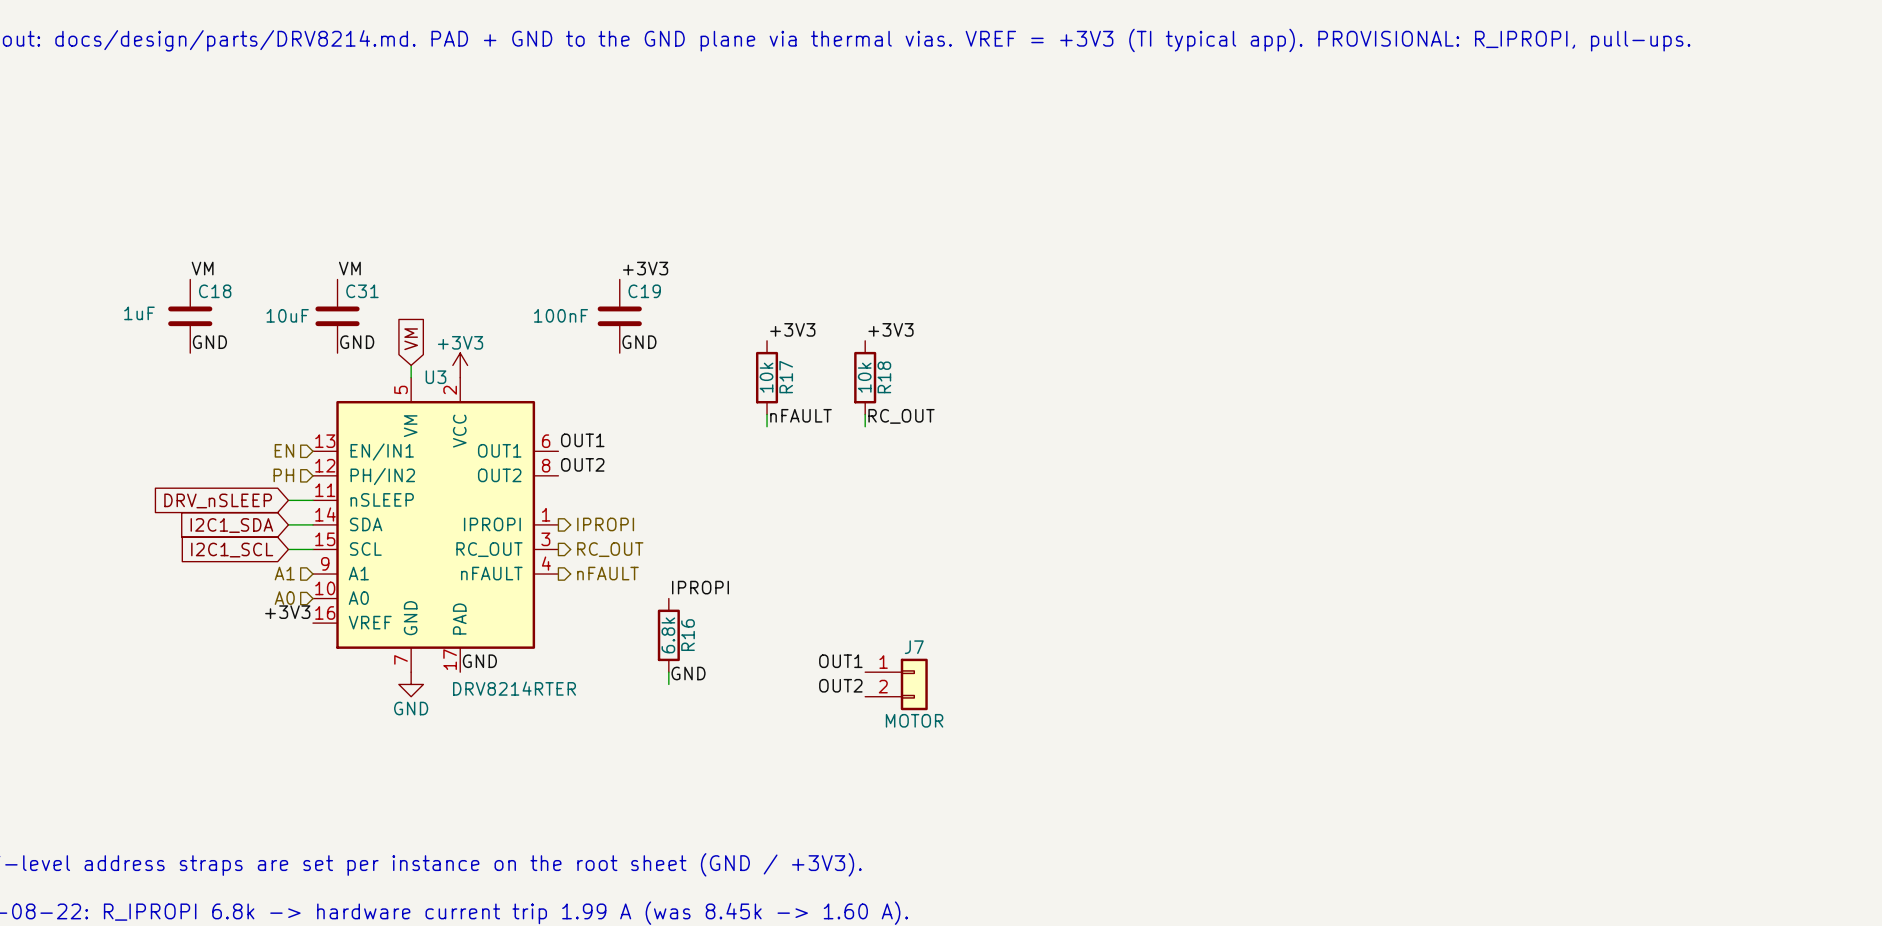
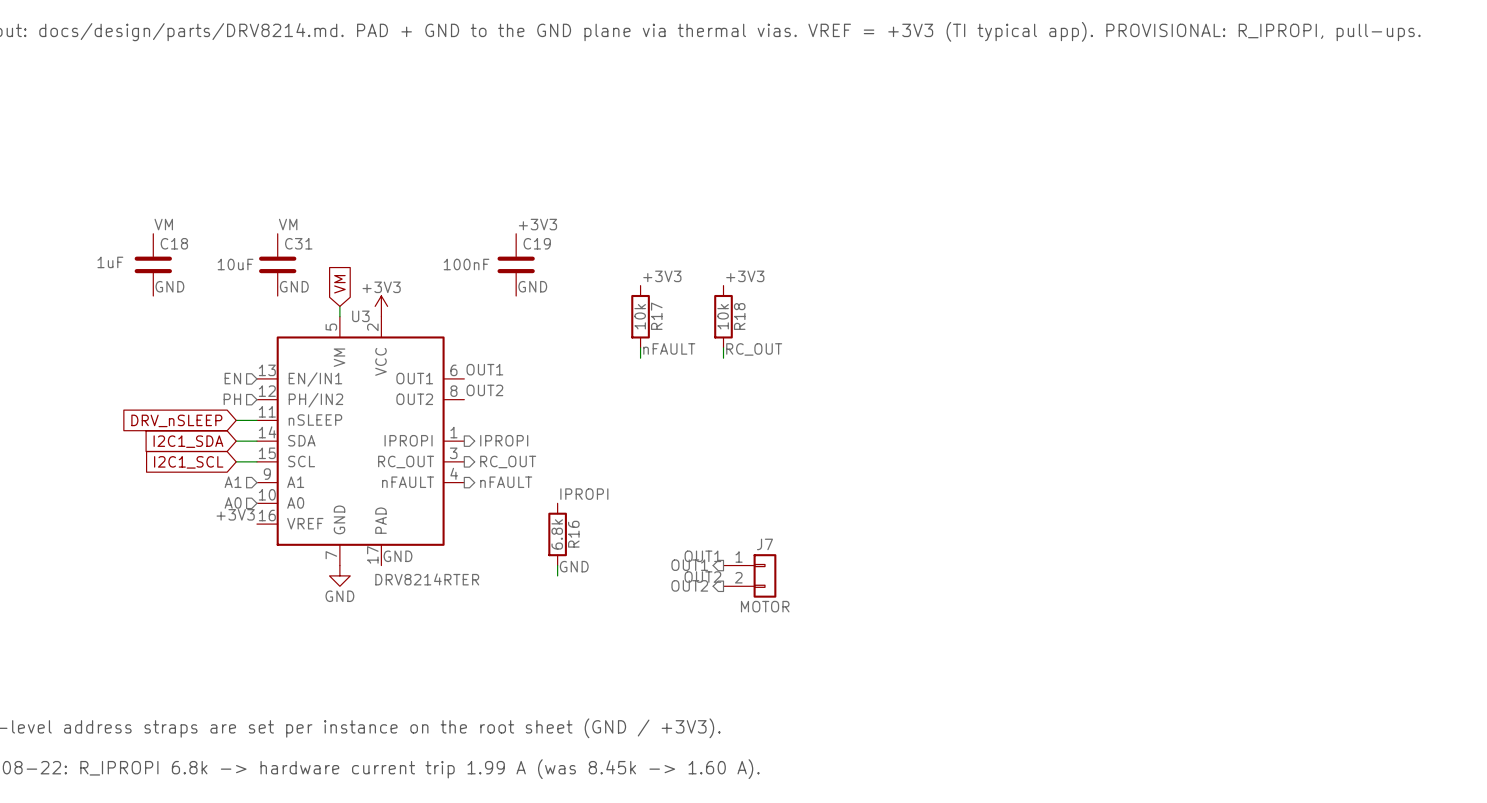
hierarchical label: none -> OUT1 (689, 565)
hierarchical label: none -> OUT2 (689, 585)

